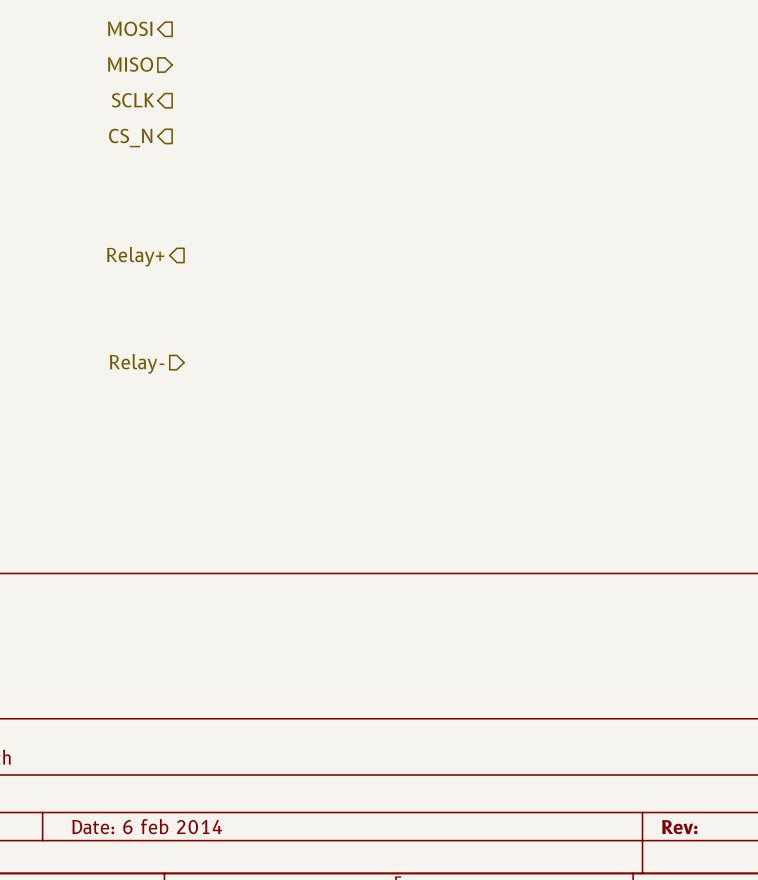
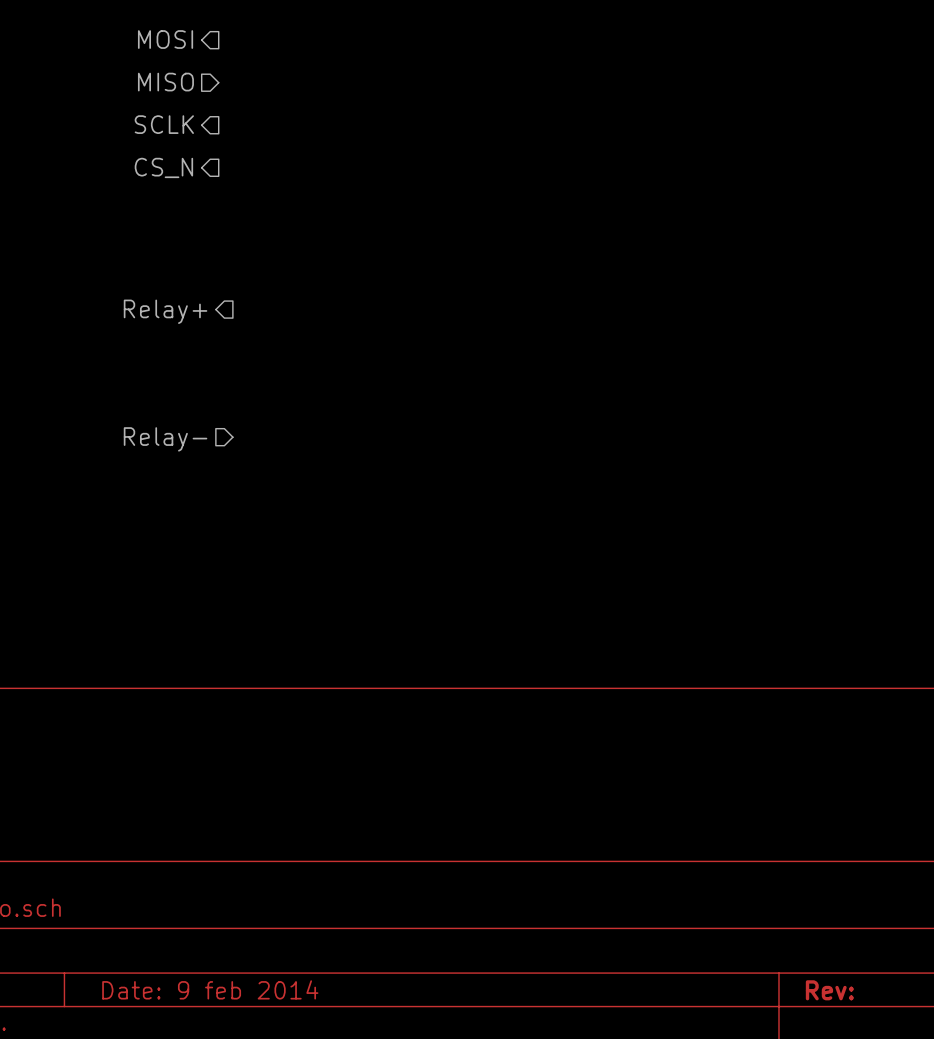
title block: Date: 6 feb 2014 (147, 826) -> Date: 9 feb 2014 (210, 989)

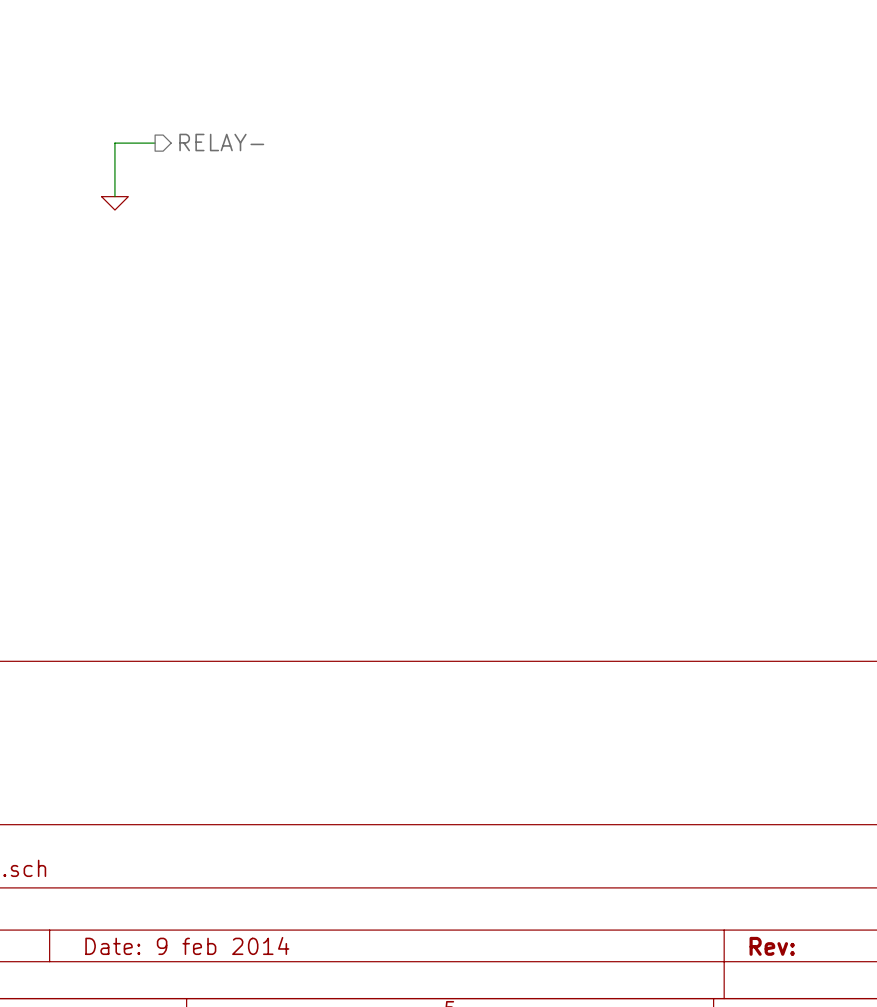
hierarchical label: MOSI (165, 39) -> none
hierarchical label: MISO (165, 82) -> none
hierarchical label: SCLK (164, 124) -> none
hierarchical label: none -> RELAY- (221, 142)
wire: none -> (155, 143) (114, 143) (114, 196)
hierarchical label: CS_N (163, 167) -> none
power symbol: none -> (114, 203)
hierarchical label: Relay+ (165, 311) -> none
hierarchical label: Relay- (165, 439) -> none

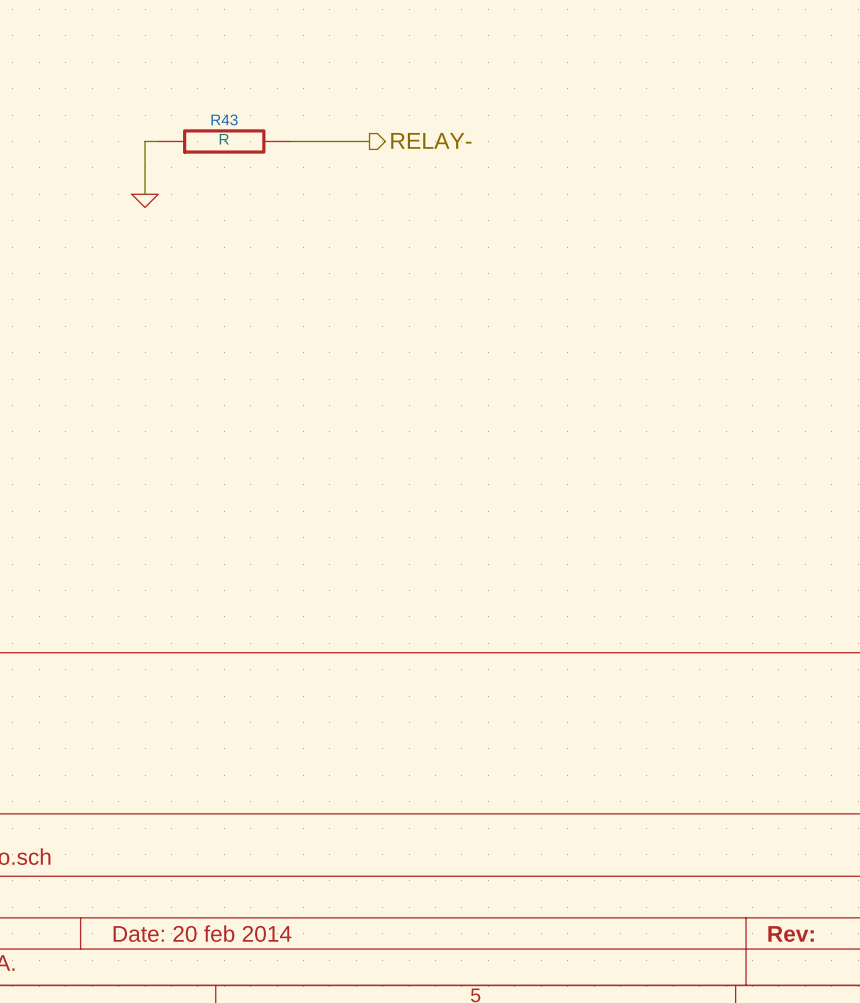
hierarchical label position: RELAY- (221, 142) -> RELAY- (431, 140)
R43: none -> R (224, 141)
wire: none -> (290, 141) (369, 141)
title block: Date: 9 feb 2014 (187, 945) -> Date: 20 feb 2014 (202, 933)

